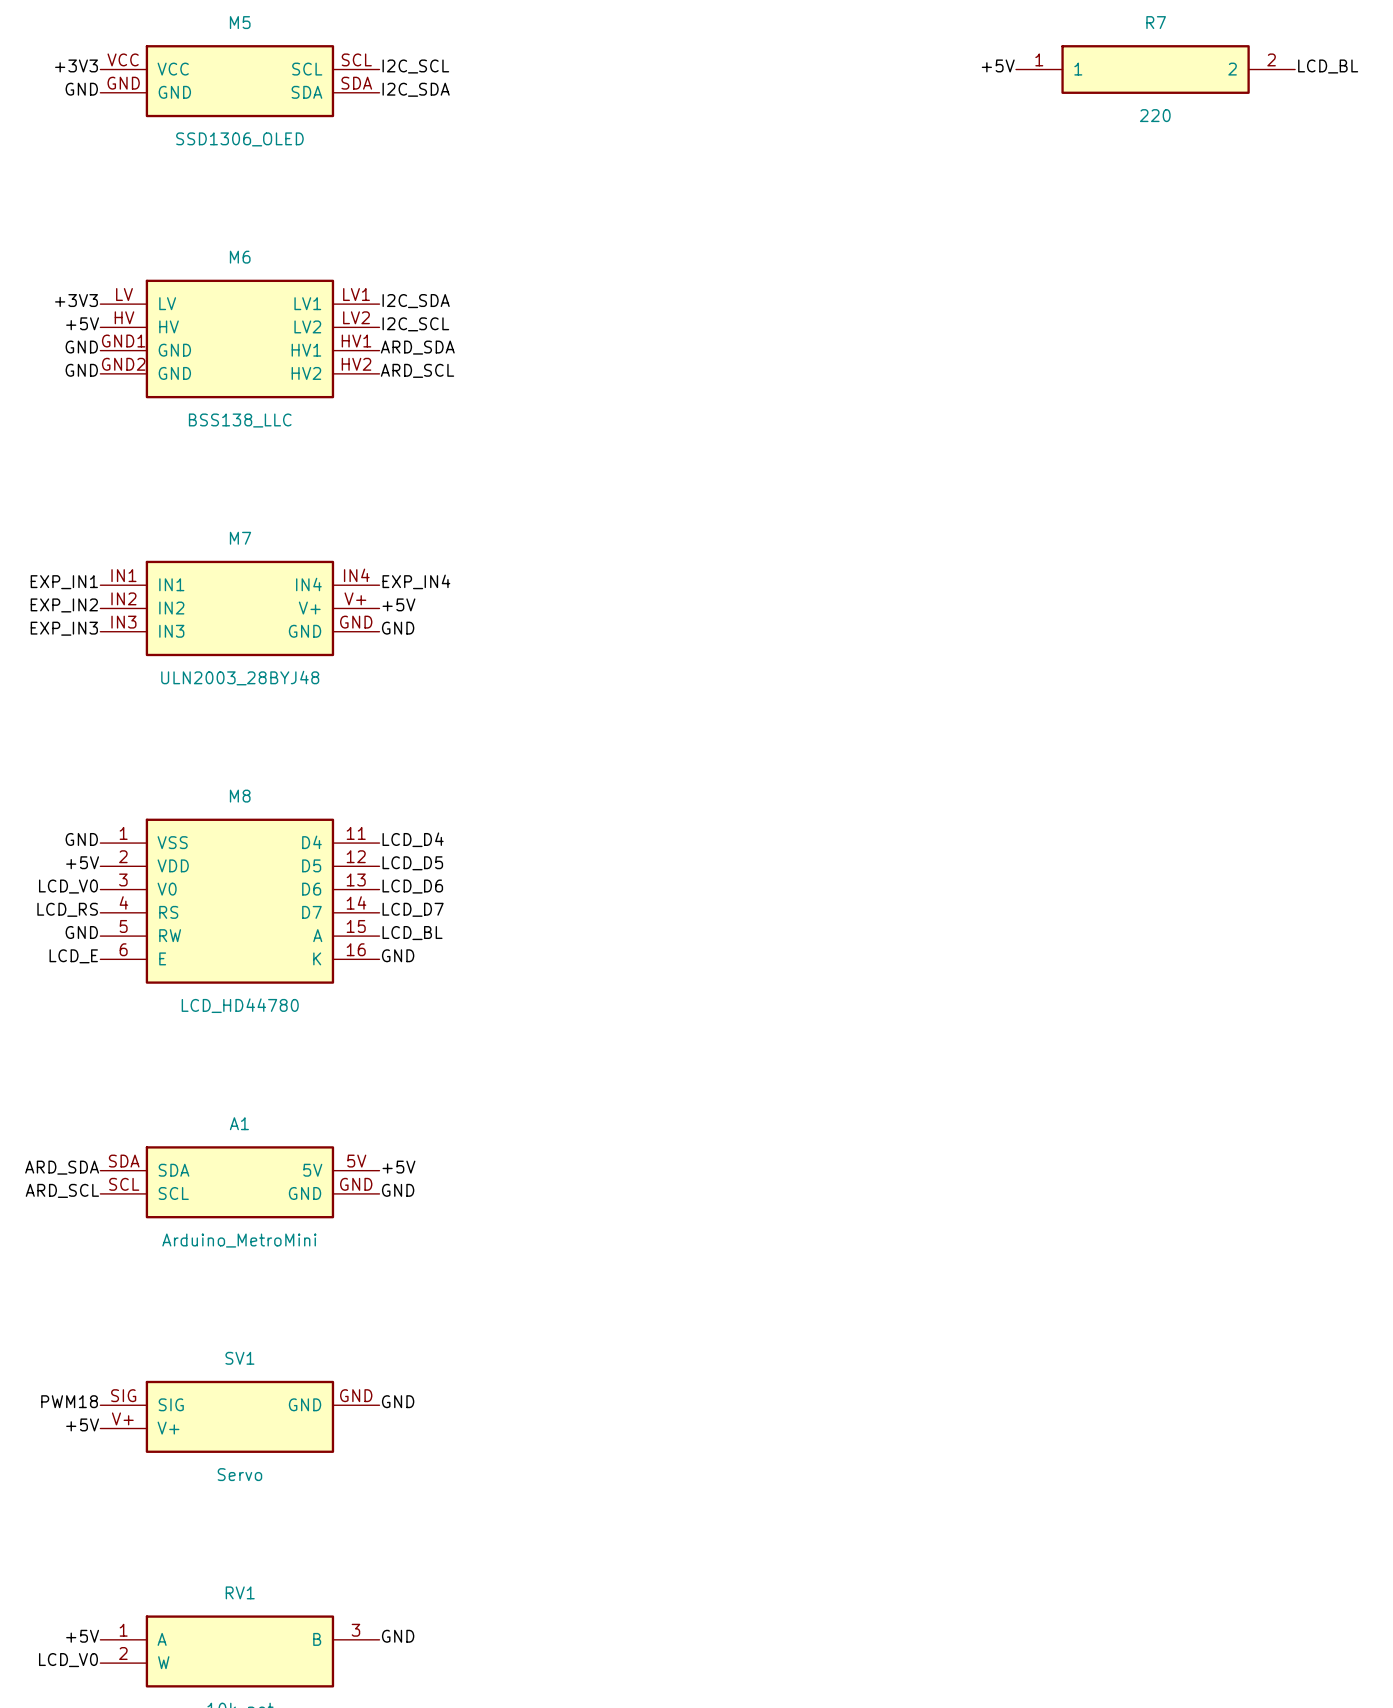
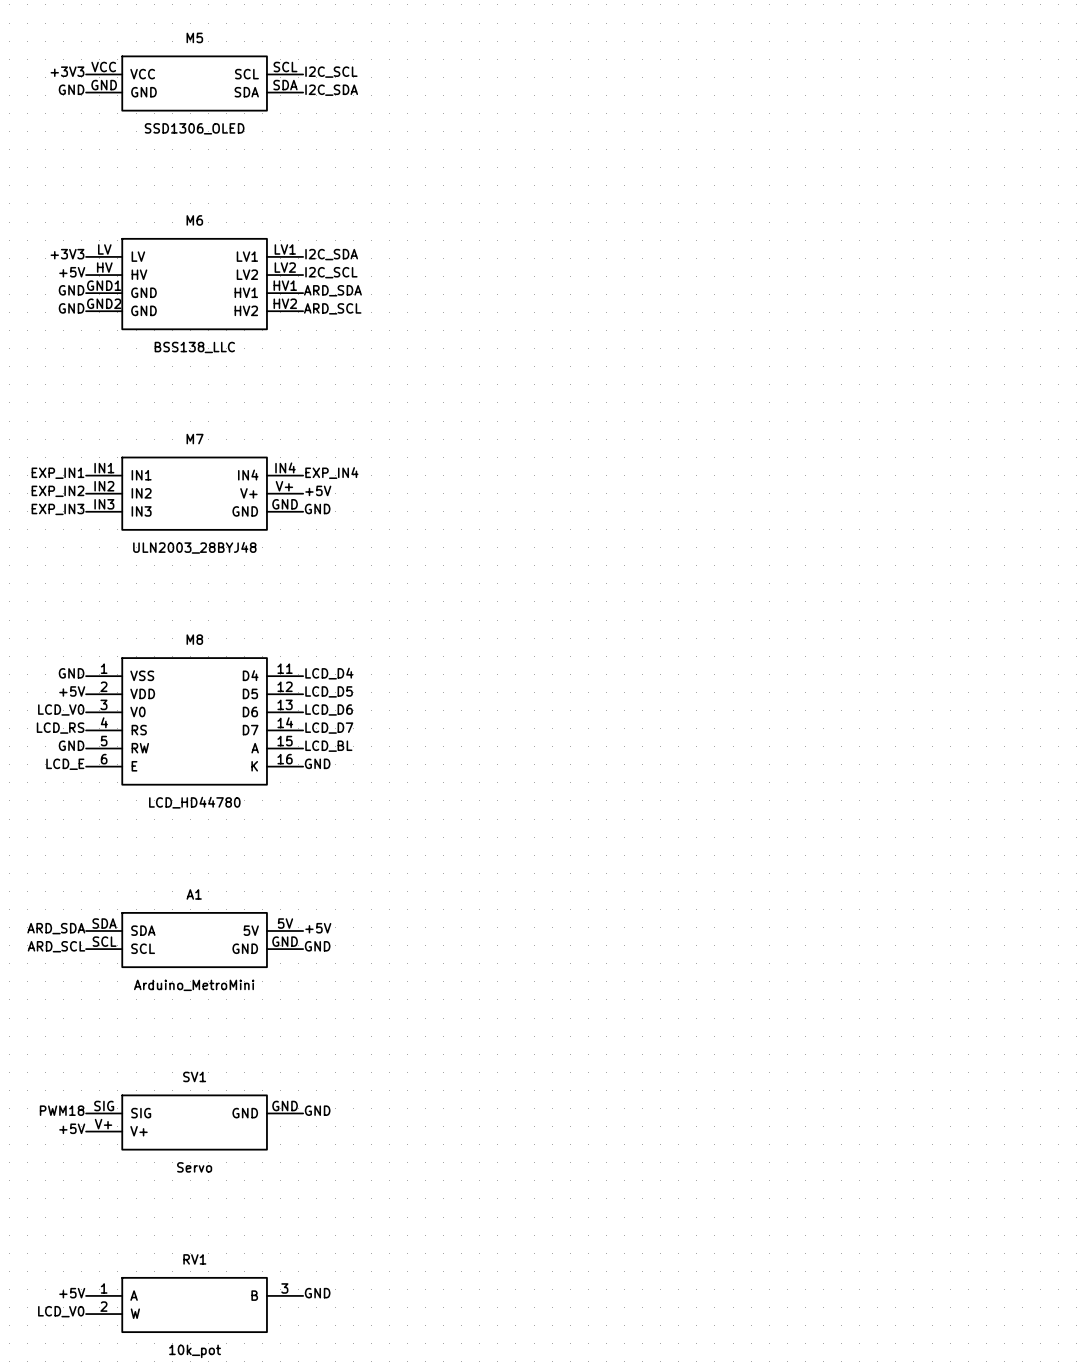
label: +5V (998, 65) -> none
label: LCD_BL (1328, 66) -> none
R7: 220 (1155, 69) -> none

